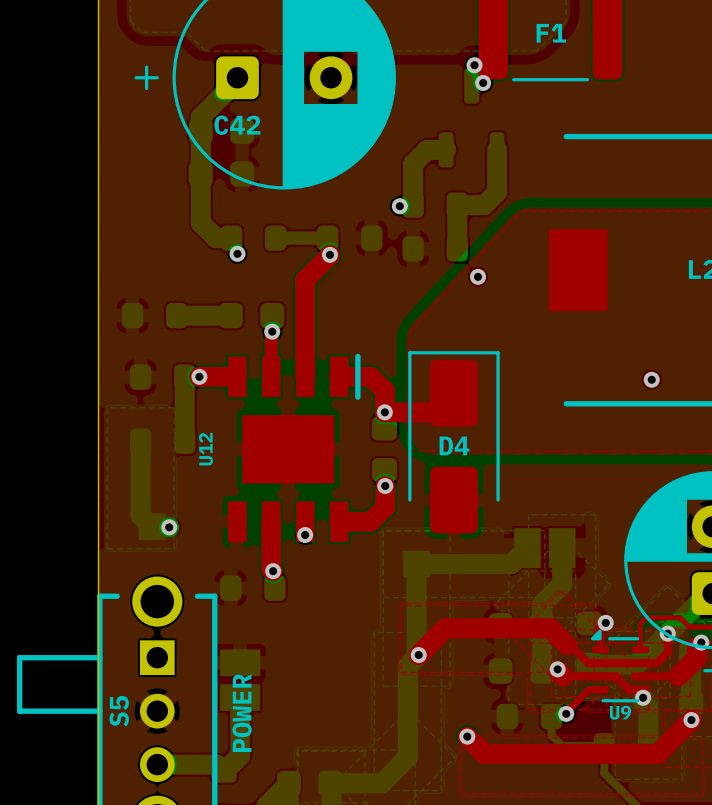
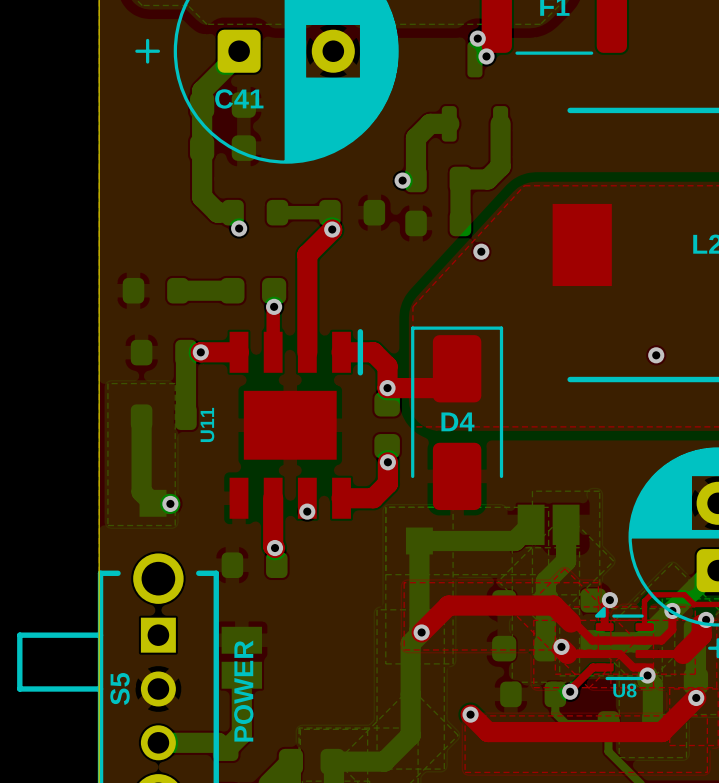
C42 name: C42 (237, 125) -> C41 (239, 98)
U12 name: U12 (205, 449) -> U11 (207, 424)
U9 name: U9 (620, 712) -> U8 (624, 690)

